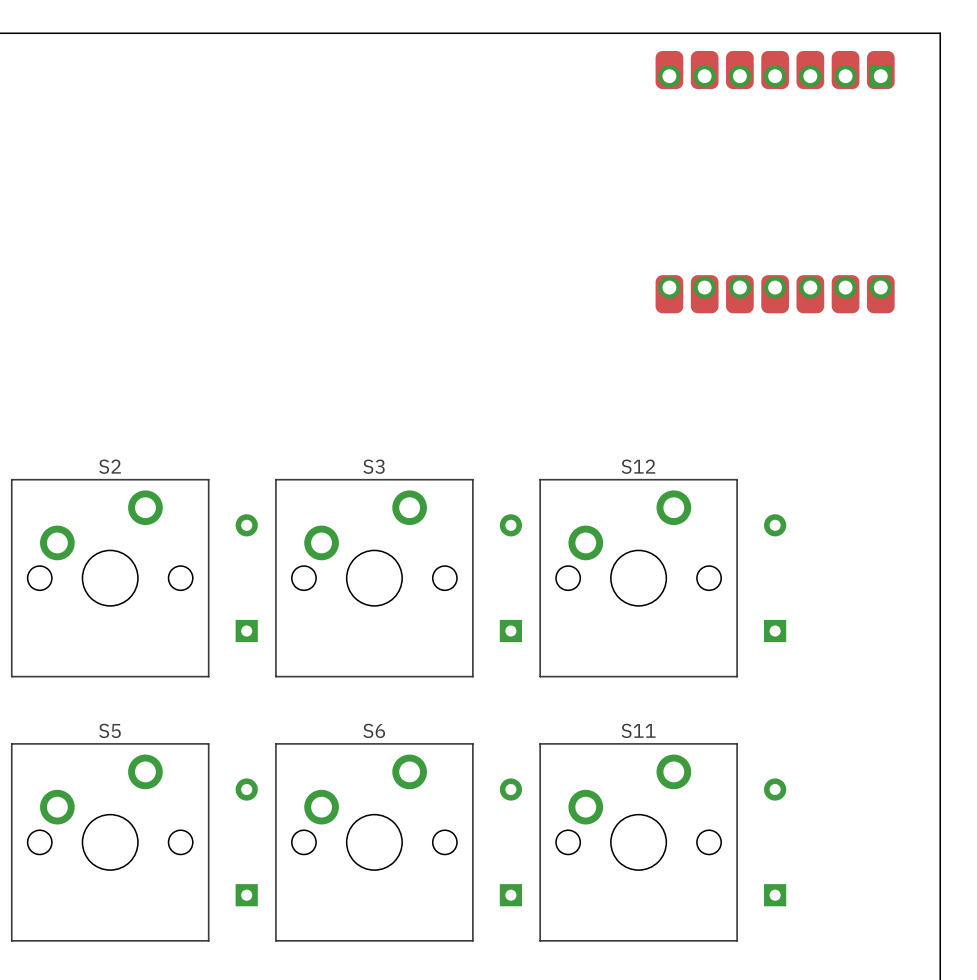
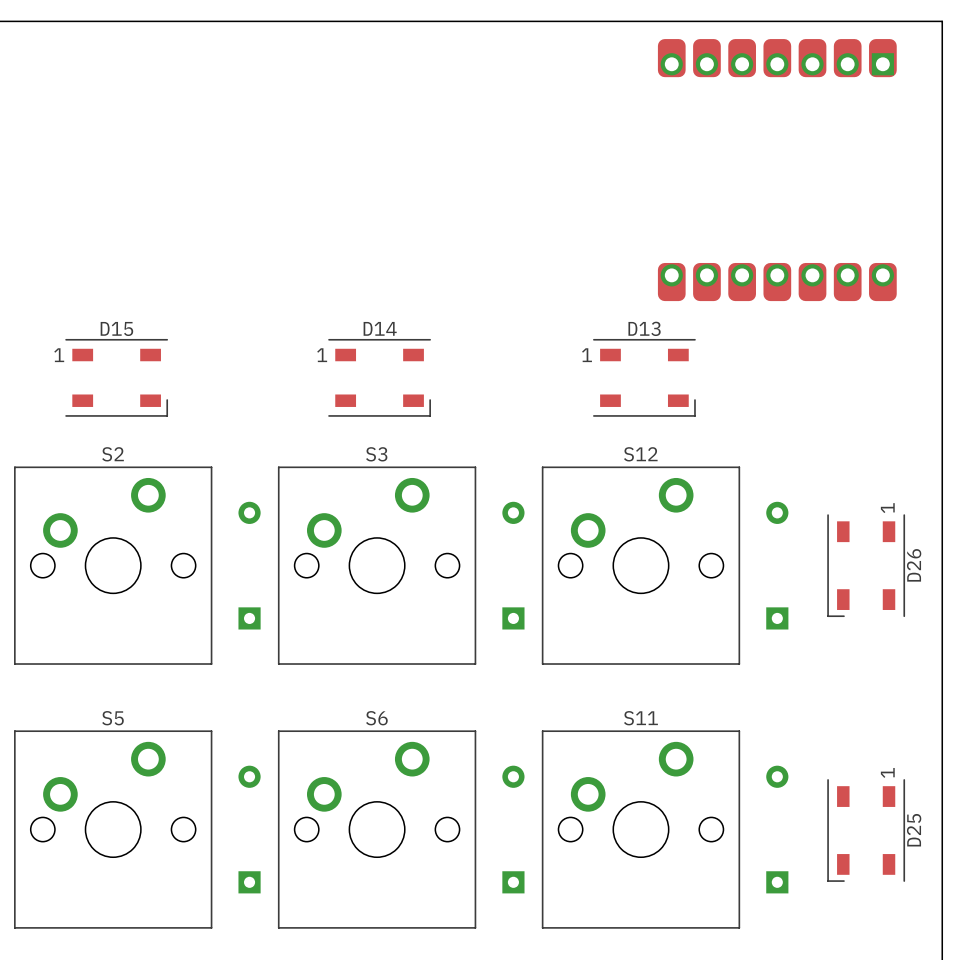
D15: none -> (116, 377)
D14: none -> (379, 377)
D13: none -> (644, 377)
D26: none -> (866, 565)
D25: none -> (866, 830)

